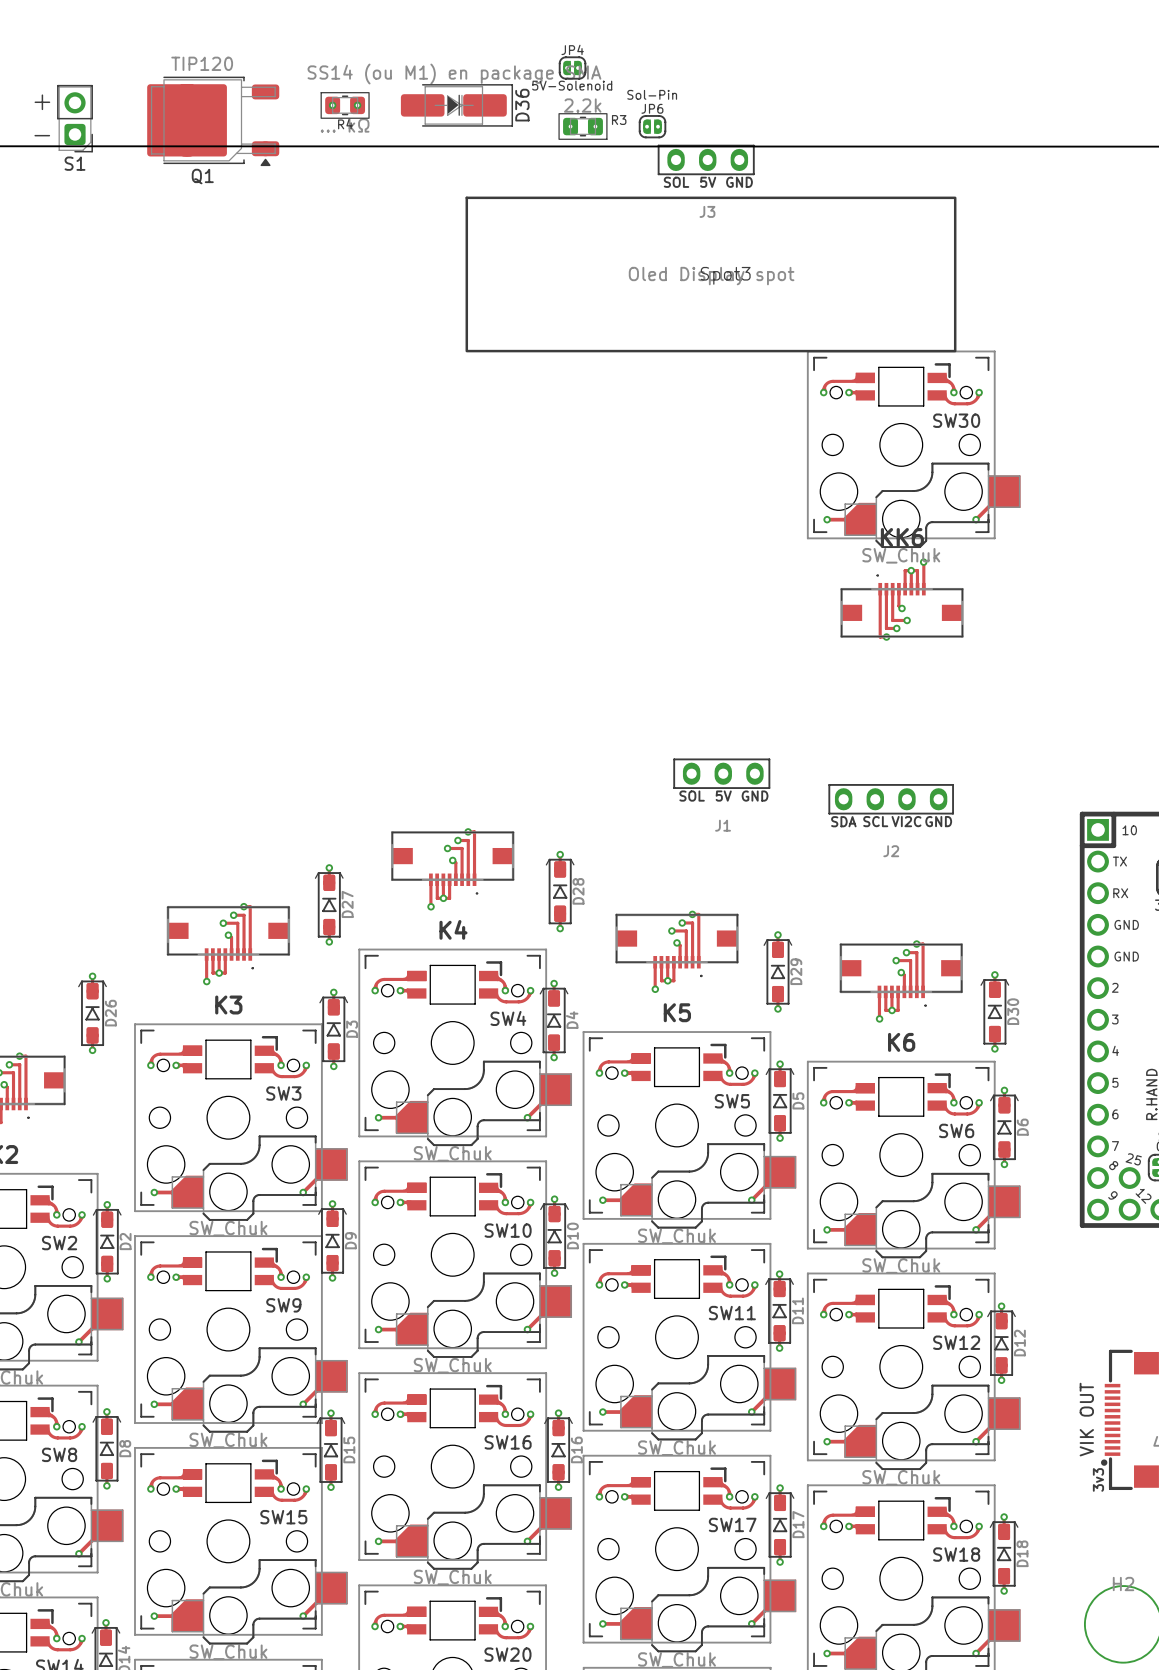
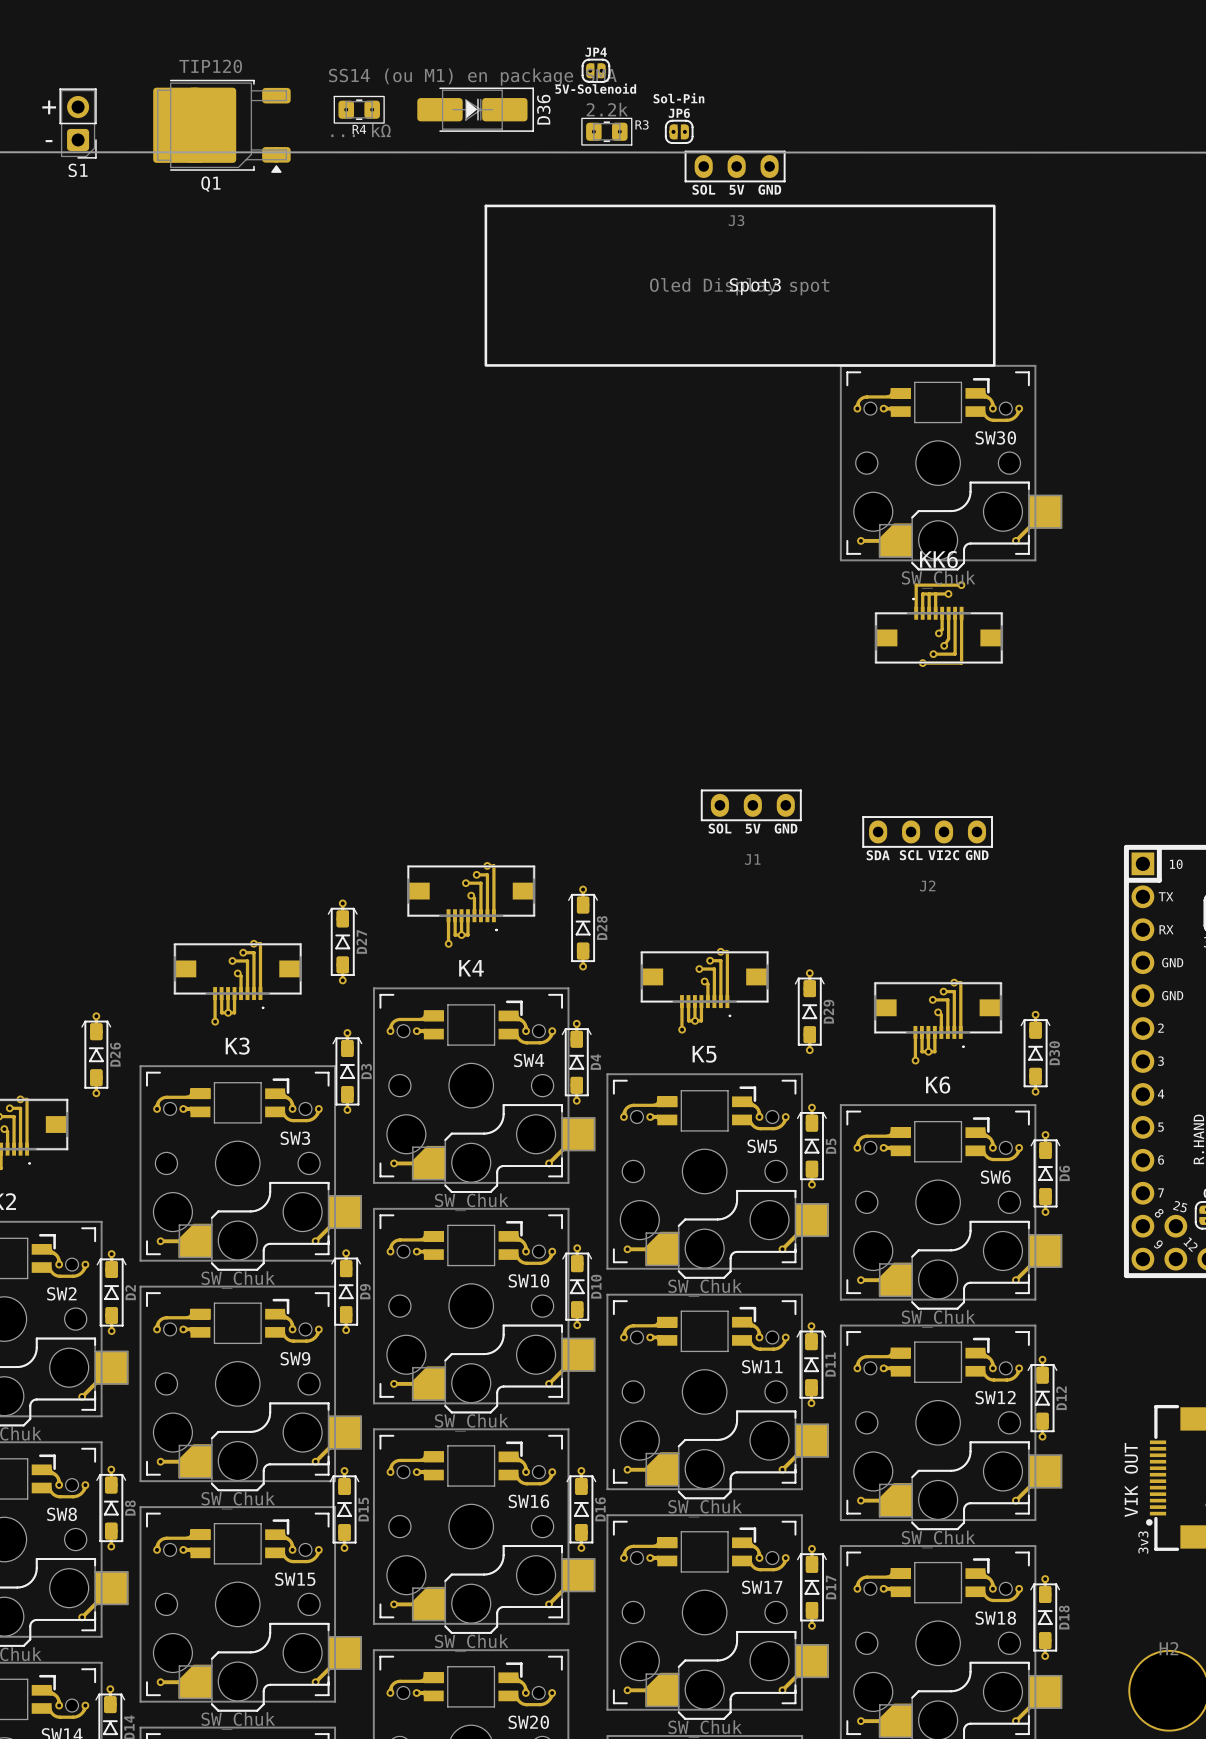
KK6 footprint: [840, 558, 964, 641] -> [874, 581, 1004, 667]

